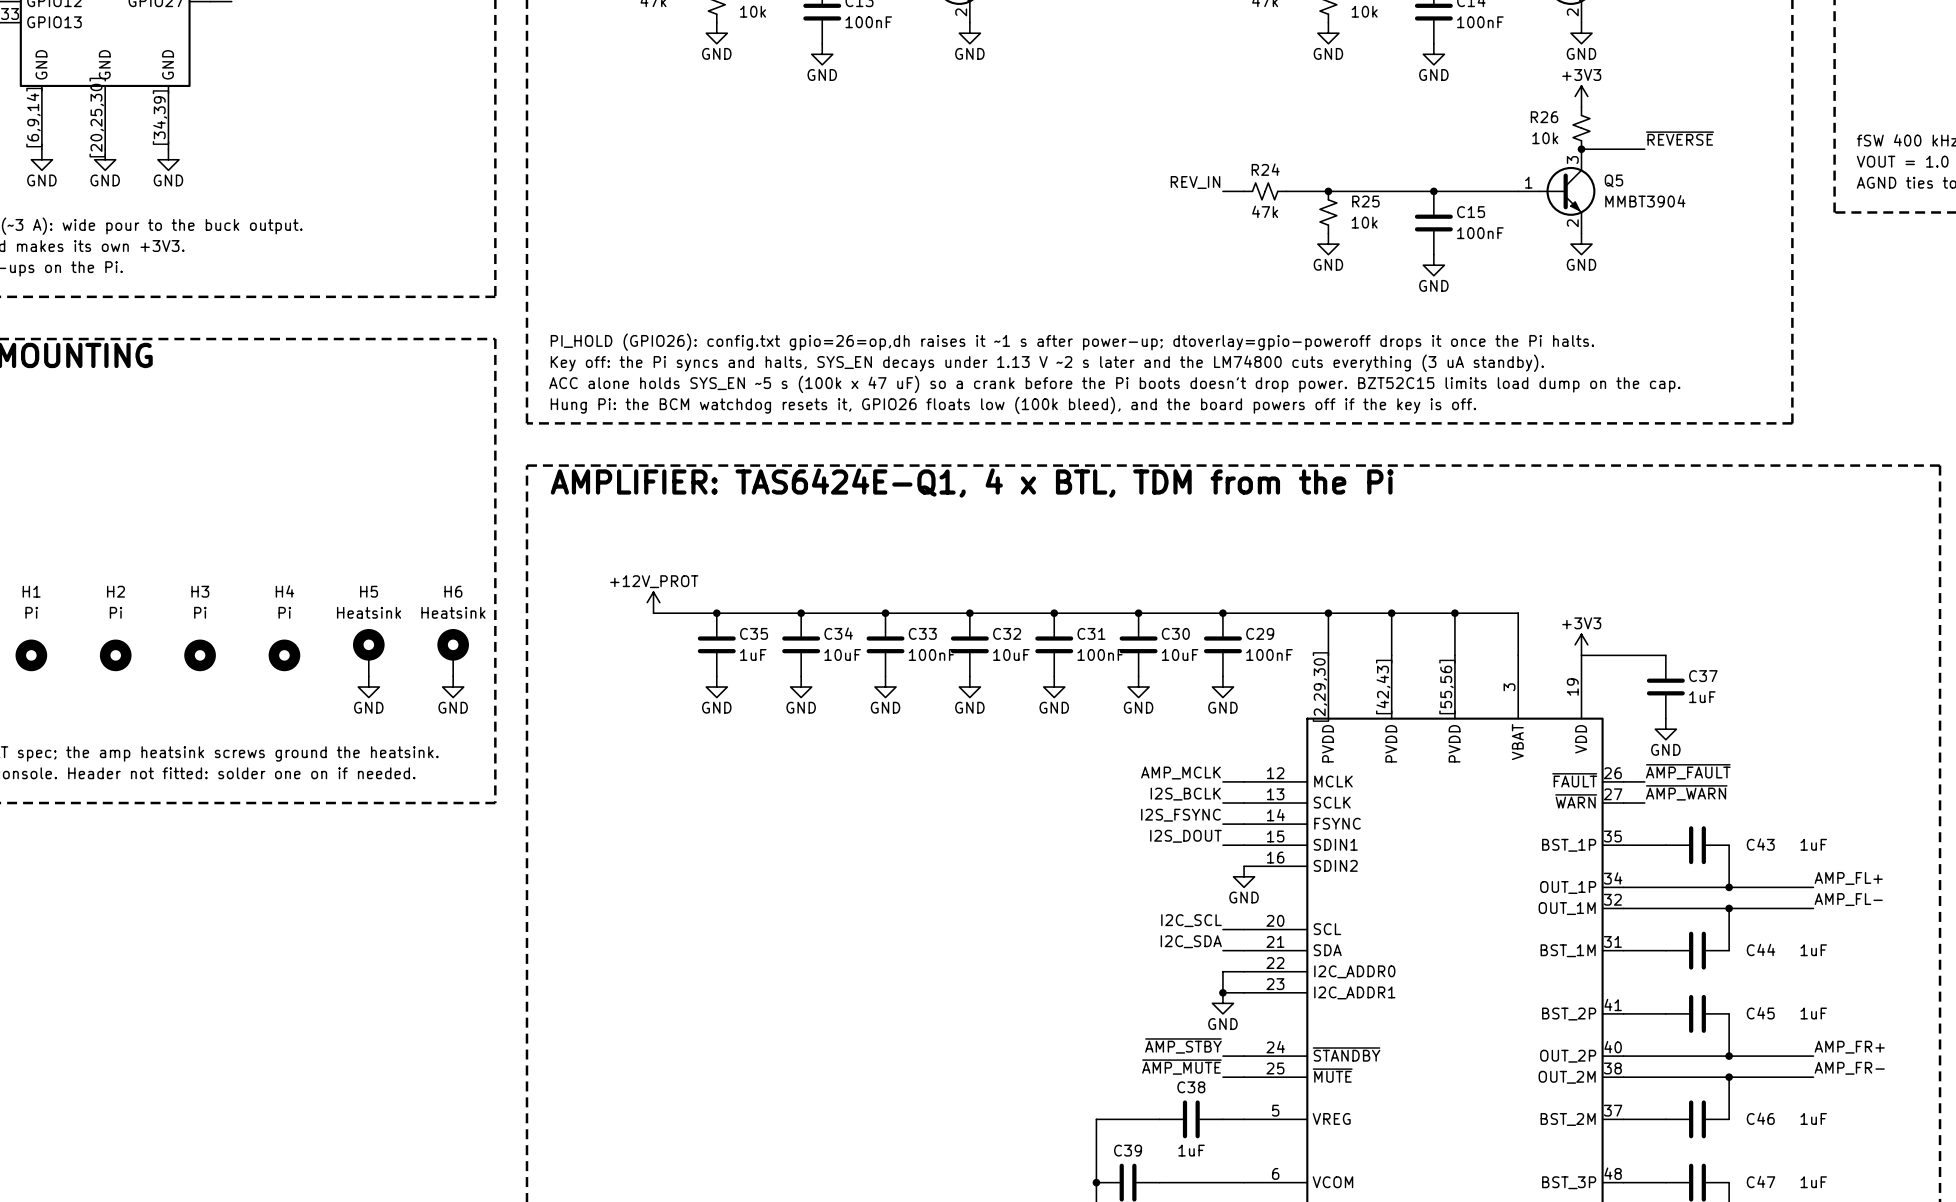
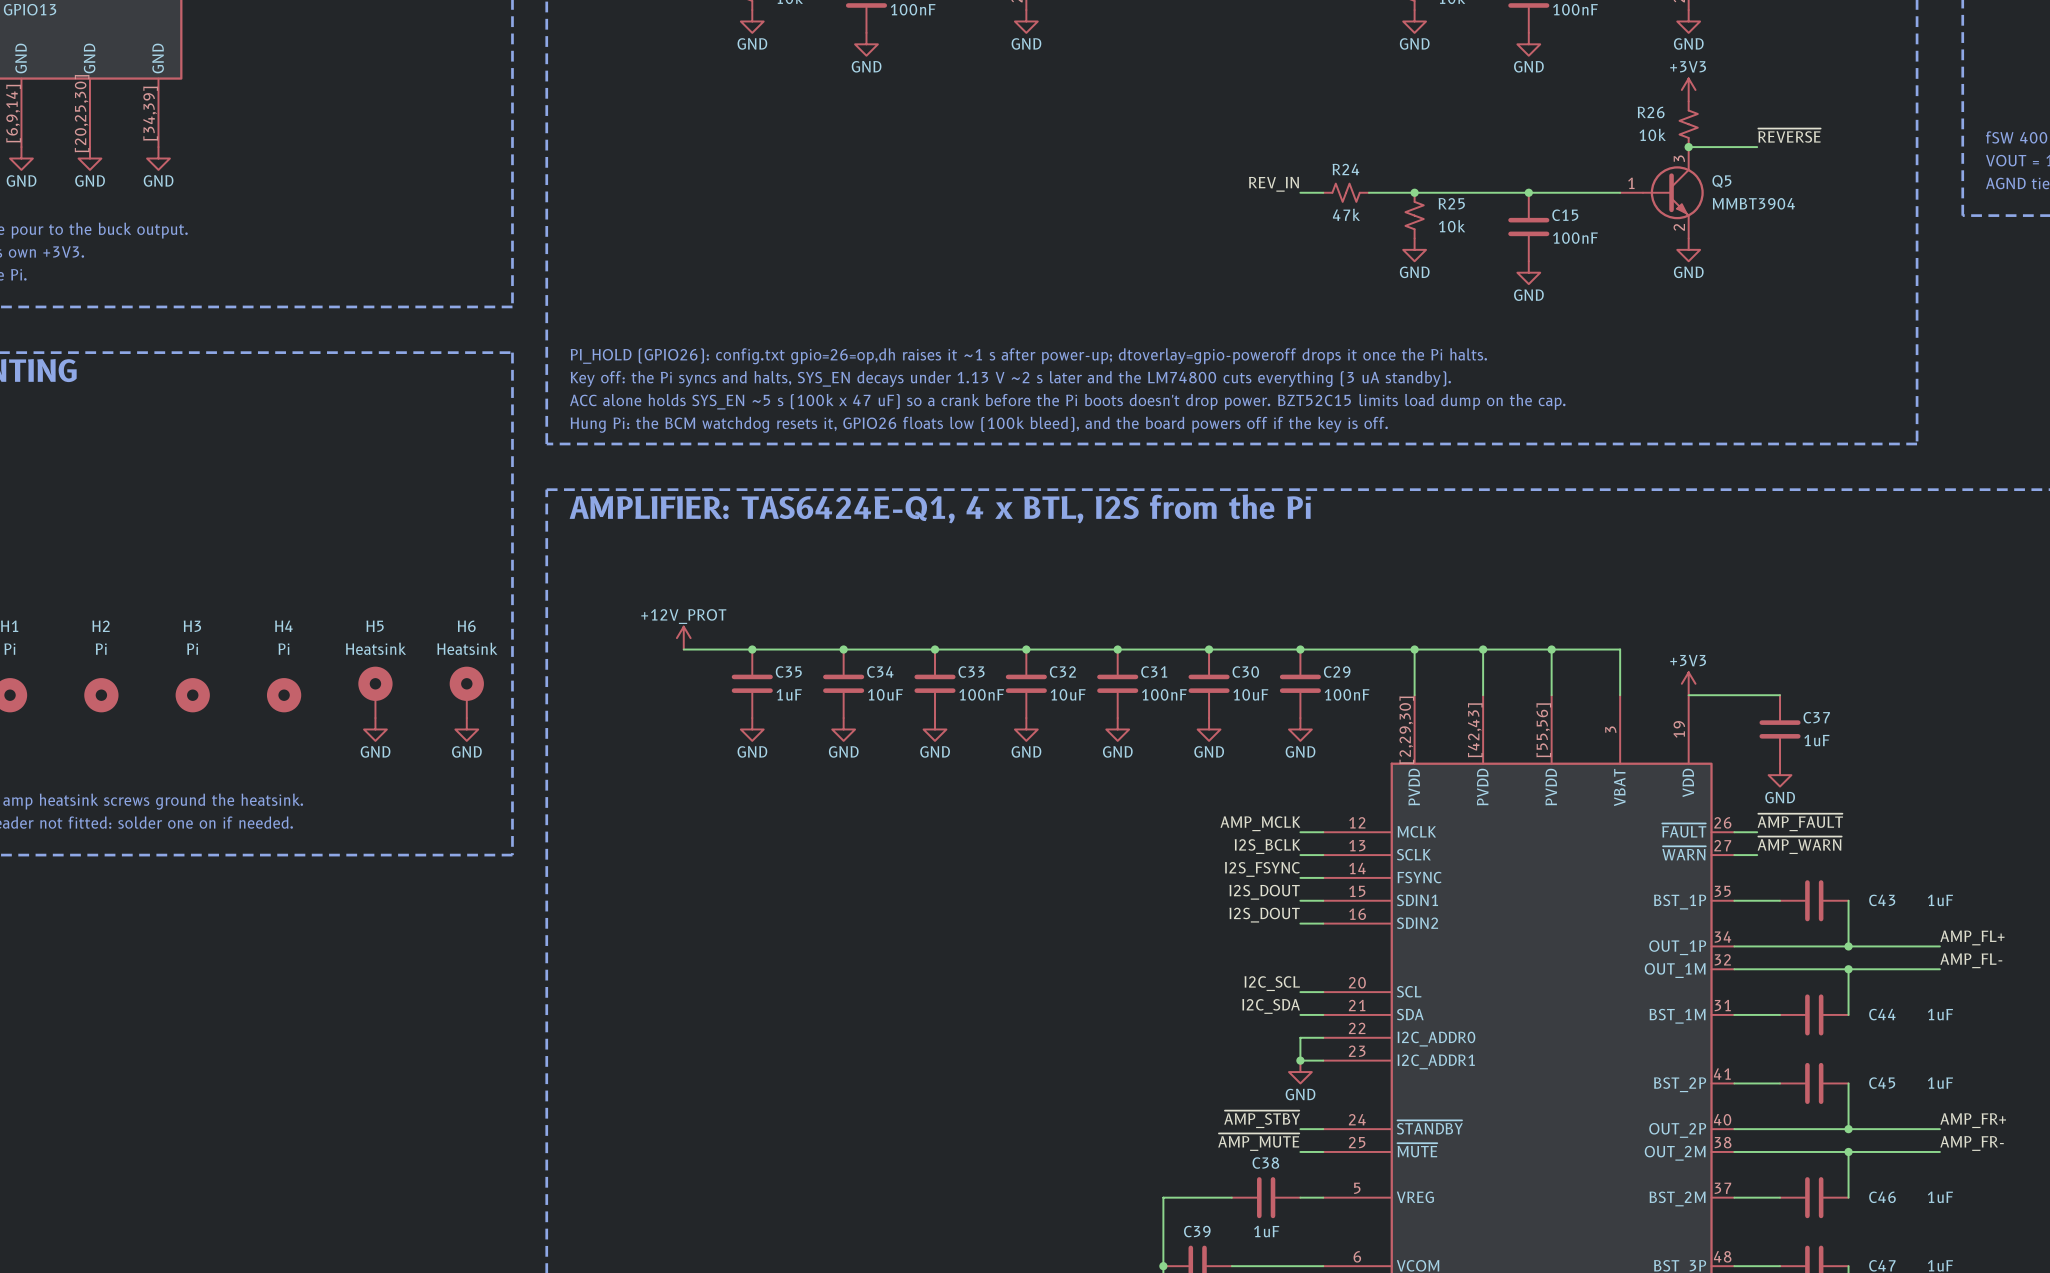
text: AMPLIFIER: TAS6424E-Q1, 4 x BTL, TDM from the Pi (972, 483) -> AMPLIFIER: TAS6424E-Q1, 4 x BTL, I2S from the Pi (940, 508)
label: none -> I2S_DOUT (1264, 915)
wire: none -> (1300, 923) (1323, 923)
power symbol: GND (1244, 876) -> none

